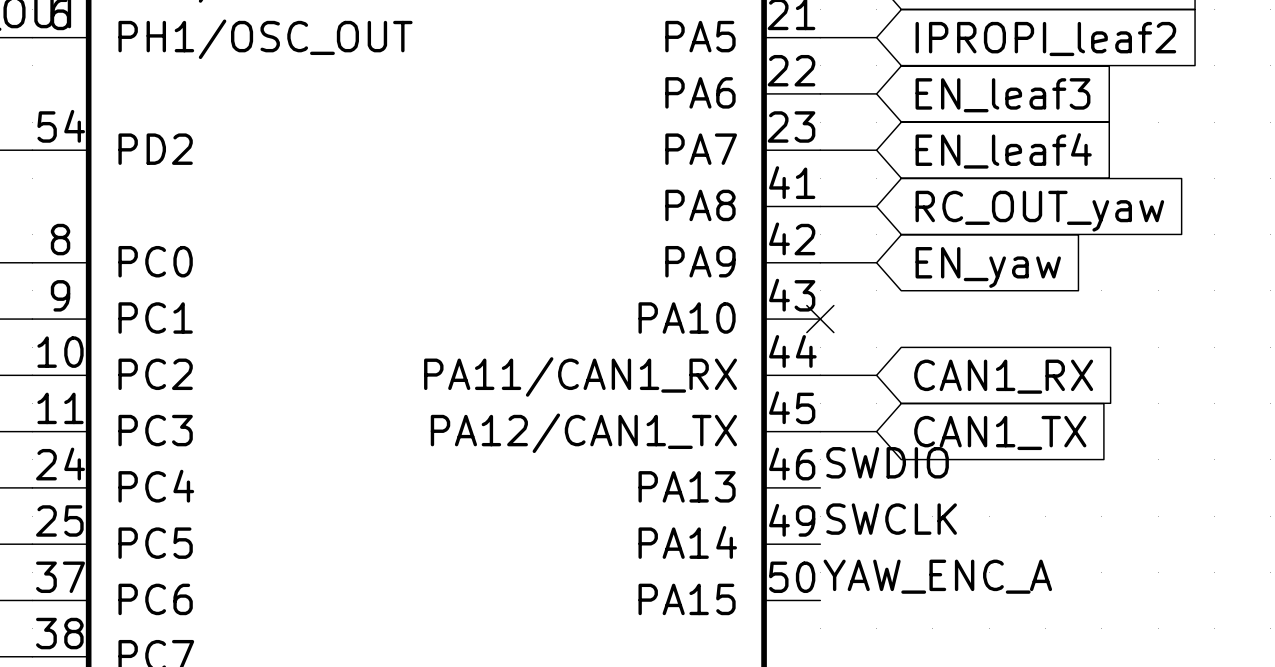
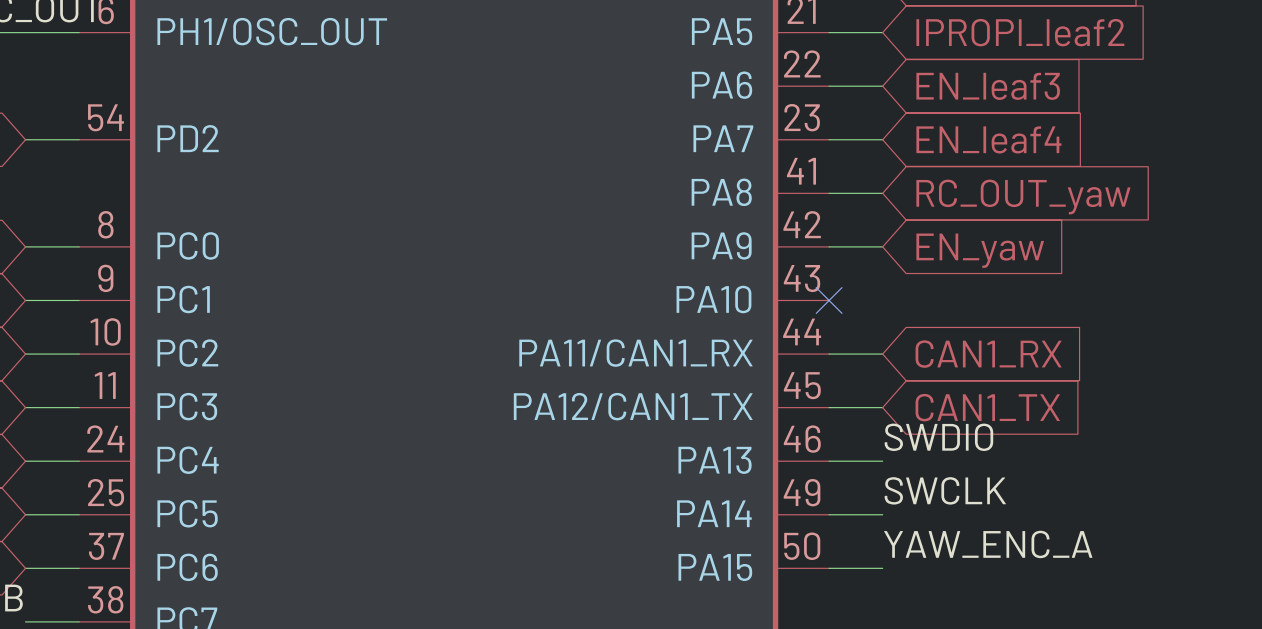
label position: SWDIO (887, 462) -> SWDIO (938, 437)
wire: none -> (829, 461) (882, 461)
label position: SWCLK (891, 519) -> SWCLK (945, 490)
wire: none -> (829, 514) (882, 514)
label position: YAW_ENC_A (937, 576) -> YAW_ENC_A (988, 544)
wire: none -> (829, 568) (882, 568)

